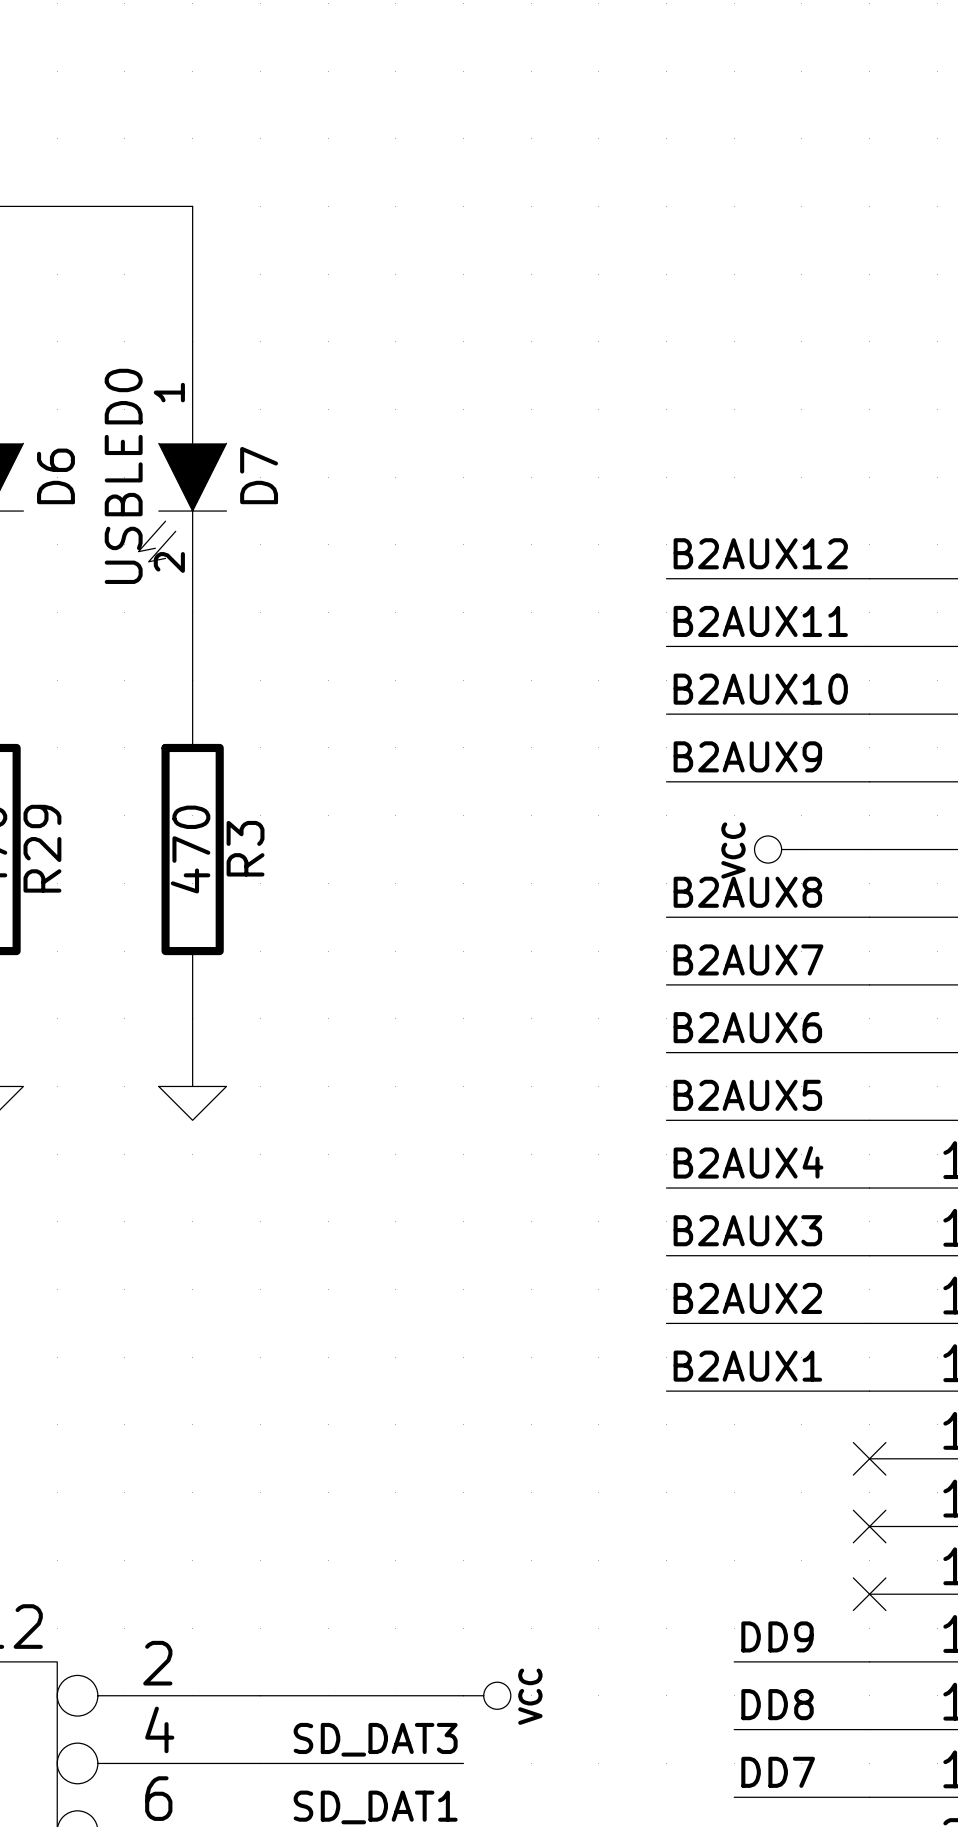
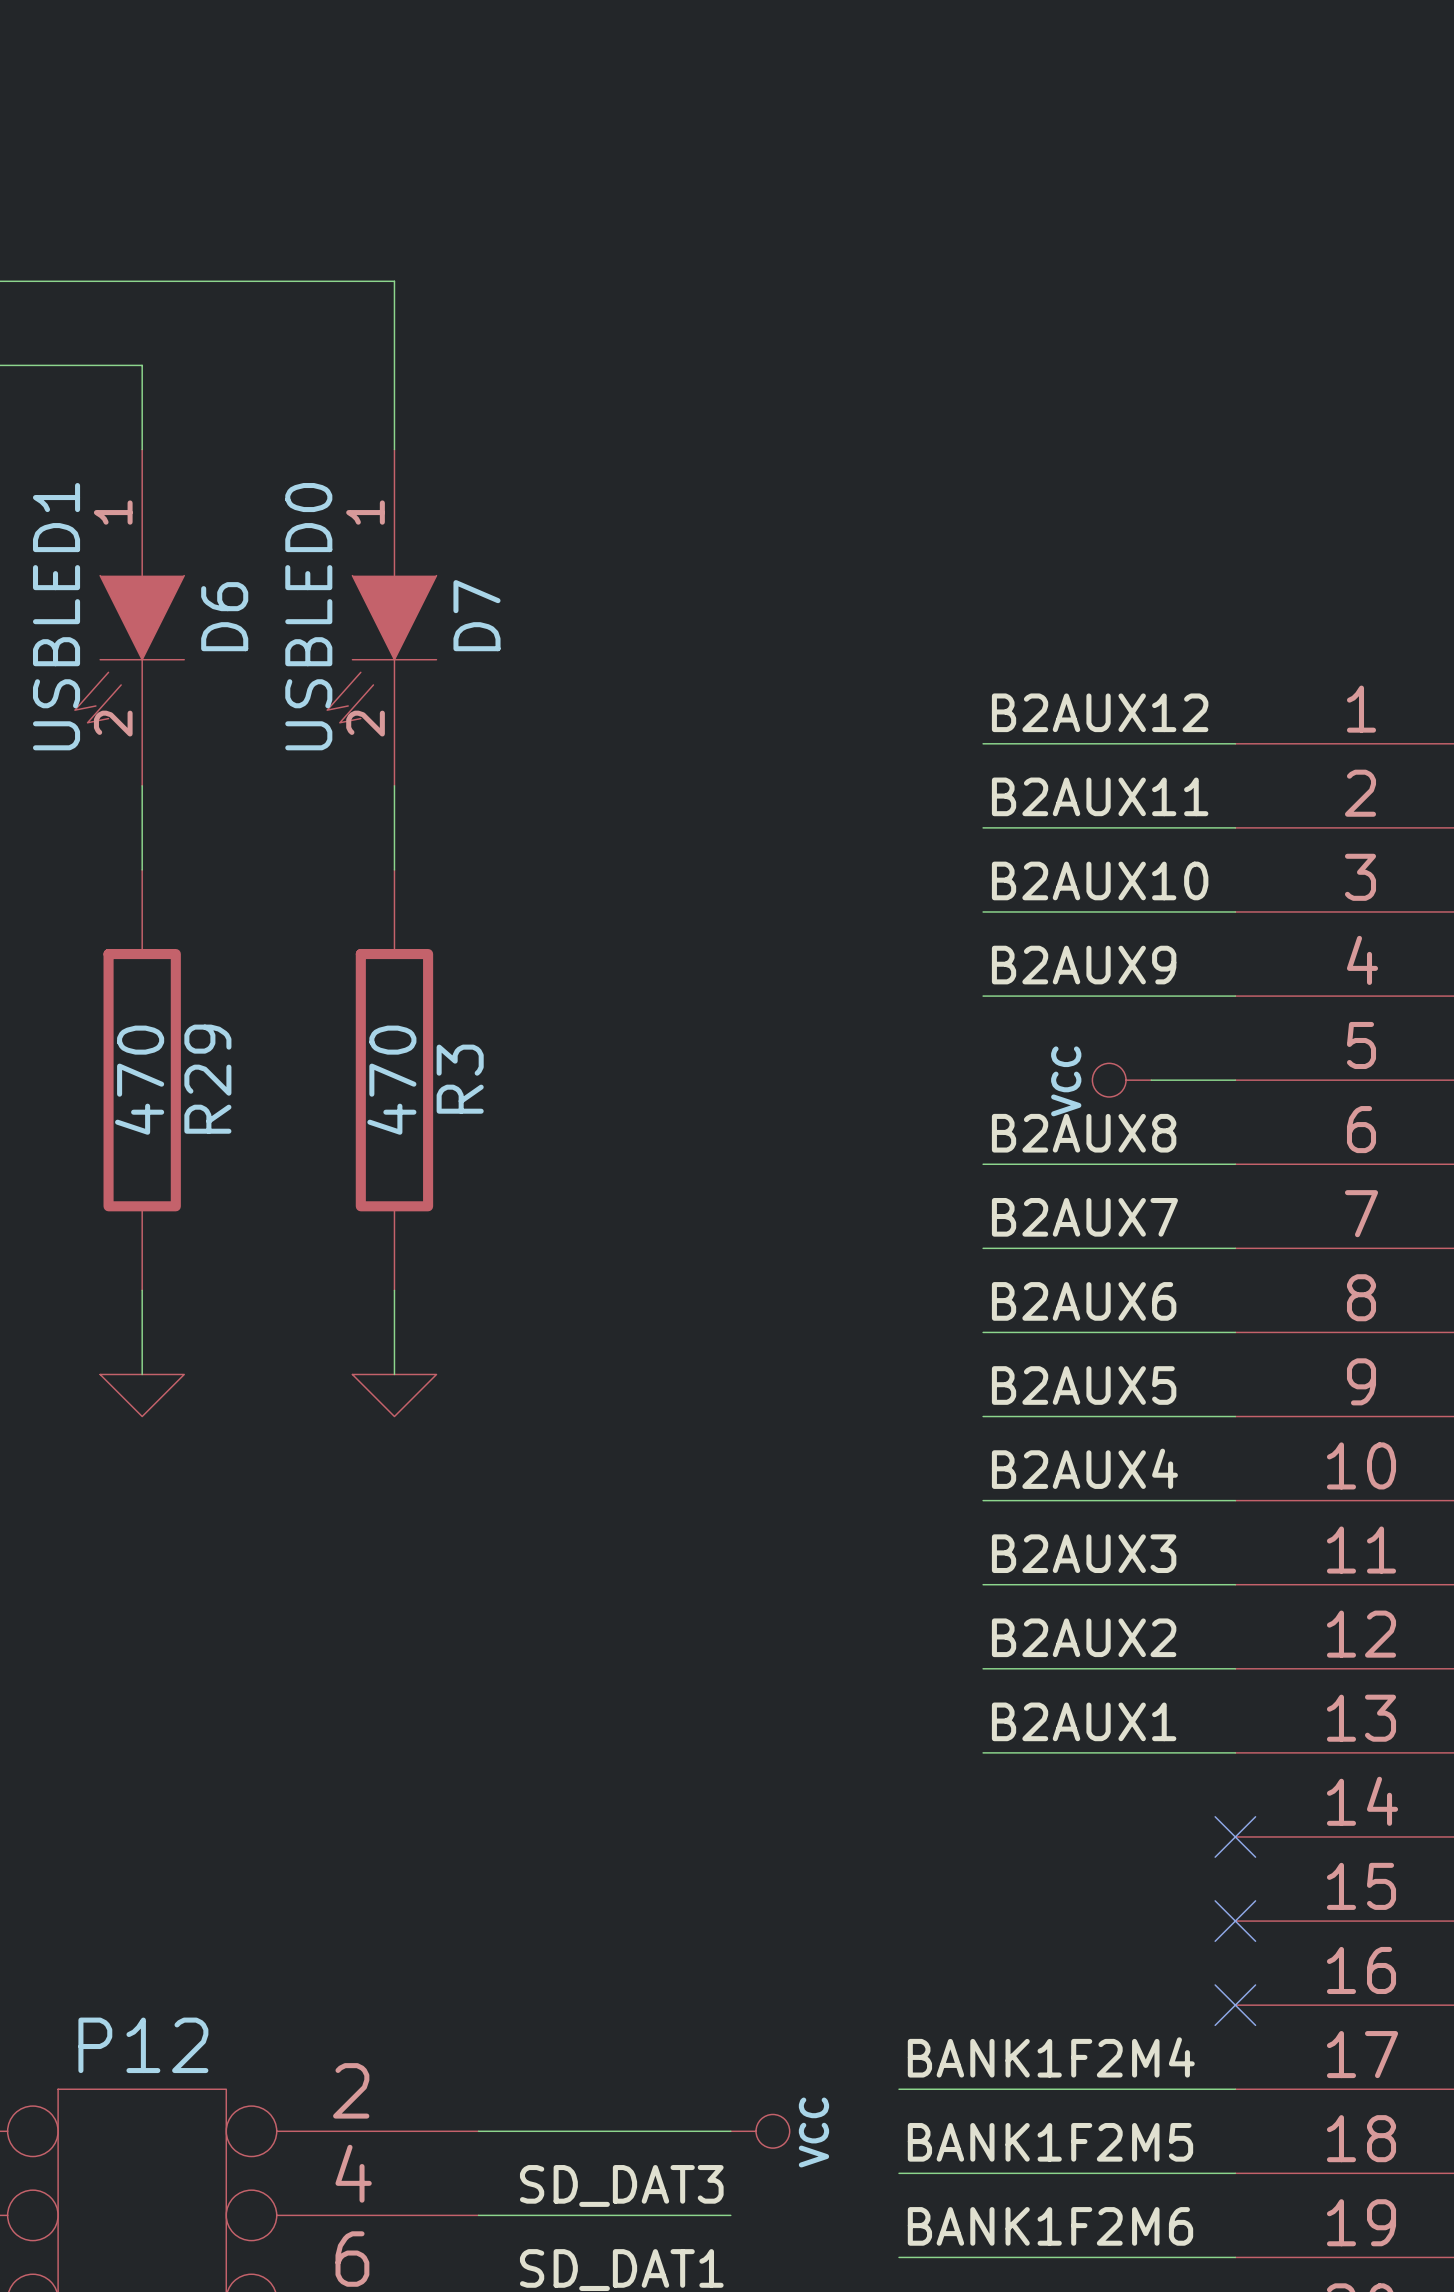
label: none -> BANK1F2M4 (1051, 2057)
label: DD9 (777, 1636) -> none
wire: none -> (899, 2089) (1067, 2089)
label: none -> BANK1F2M5 (1050, 2142)
label: DD8 (777, 1704) -> none
wire: none -> (899, 2173) (1067, 2173)
label: none -> BANK1F2M6 (1050, 2226)
label: DD7 (778, 1772) -> none
wire: none -> (899, 2257) (1067, 2257)

